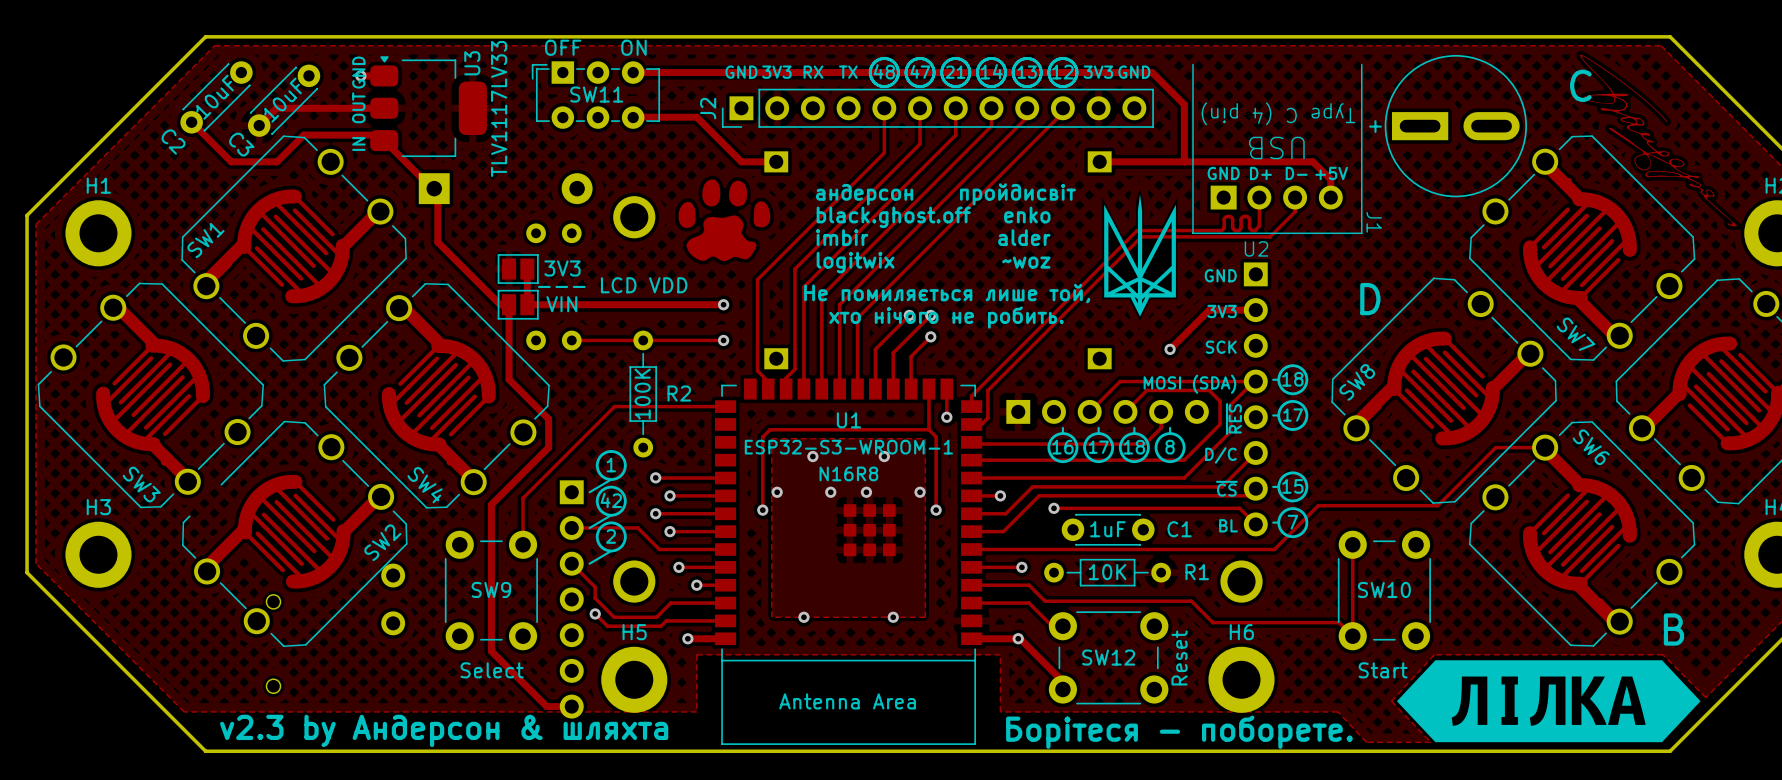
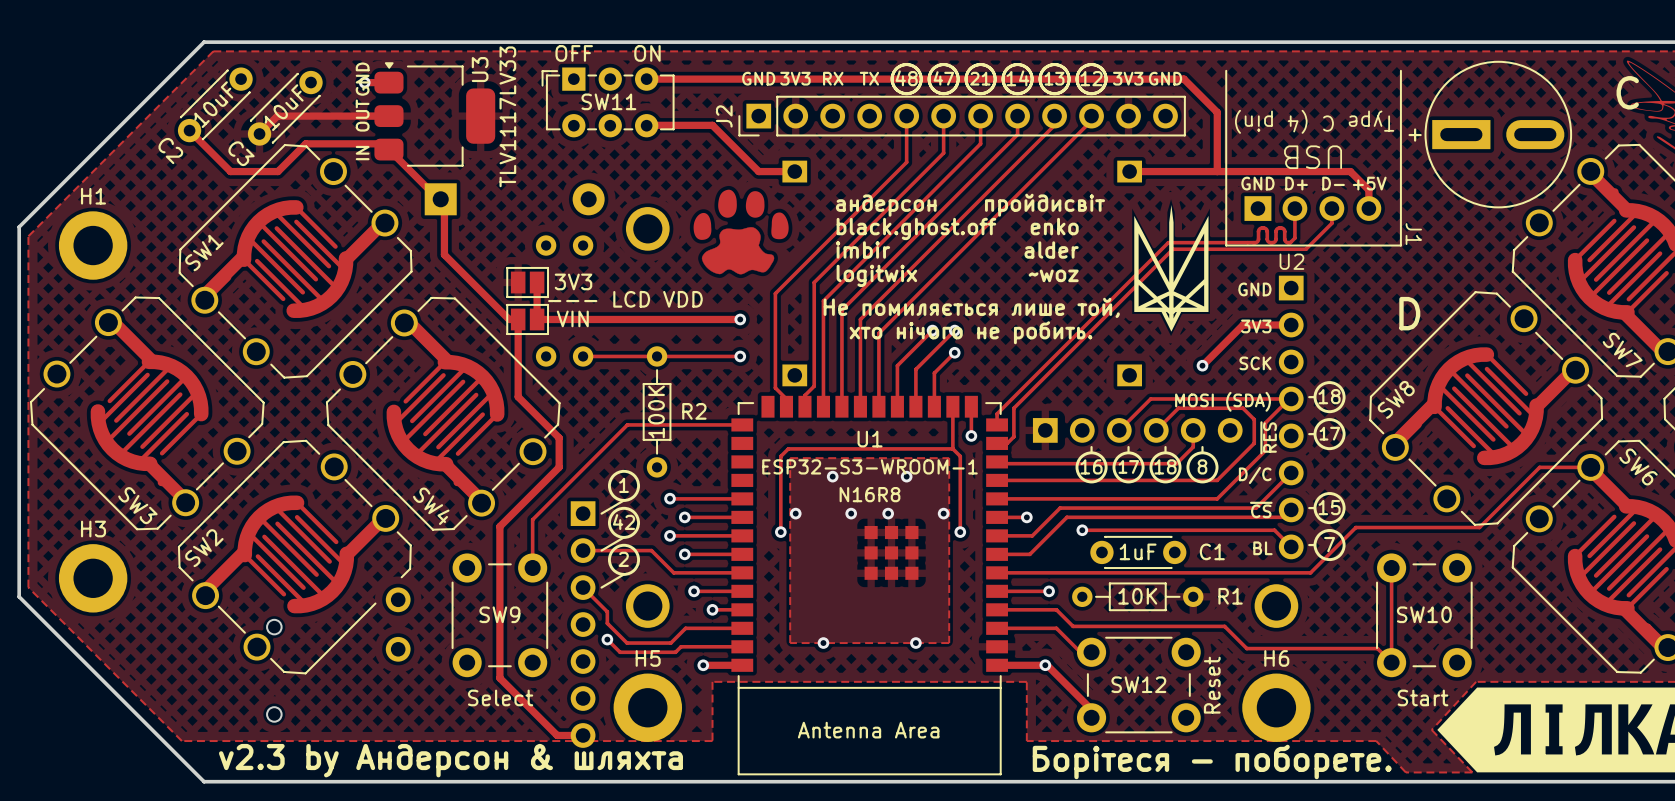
SW2 footprint: [181, 420, 408, 648] -> [178, 439, 412, 675]
SW2 name position: SW2 (382, 542) -> SW2 (204, 548)

